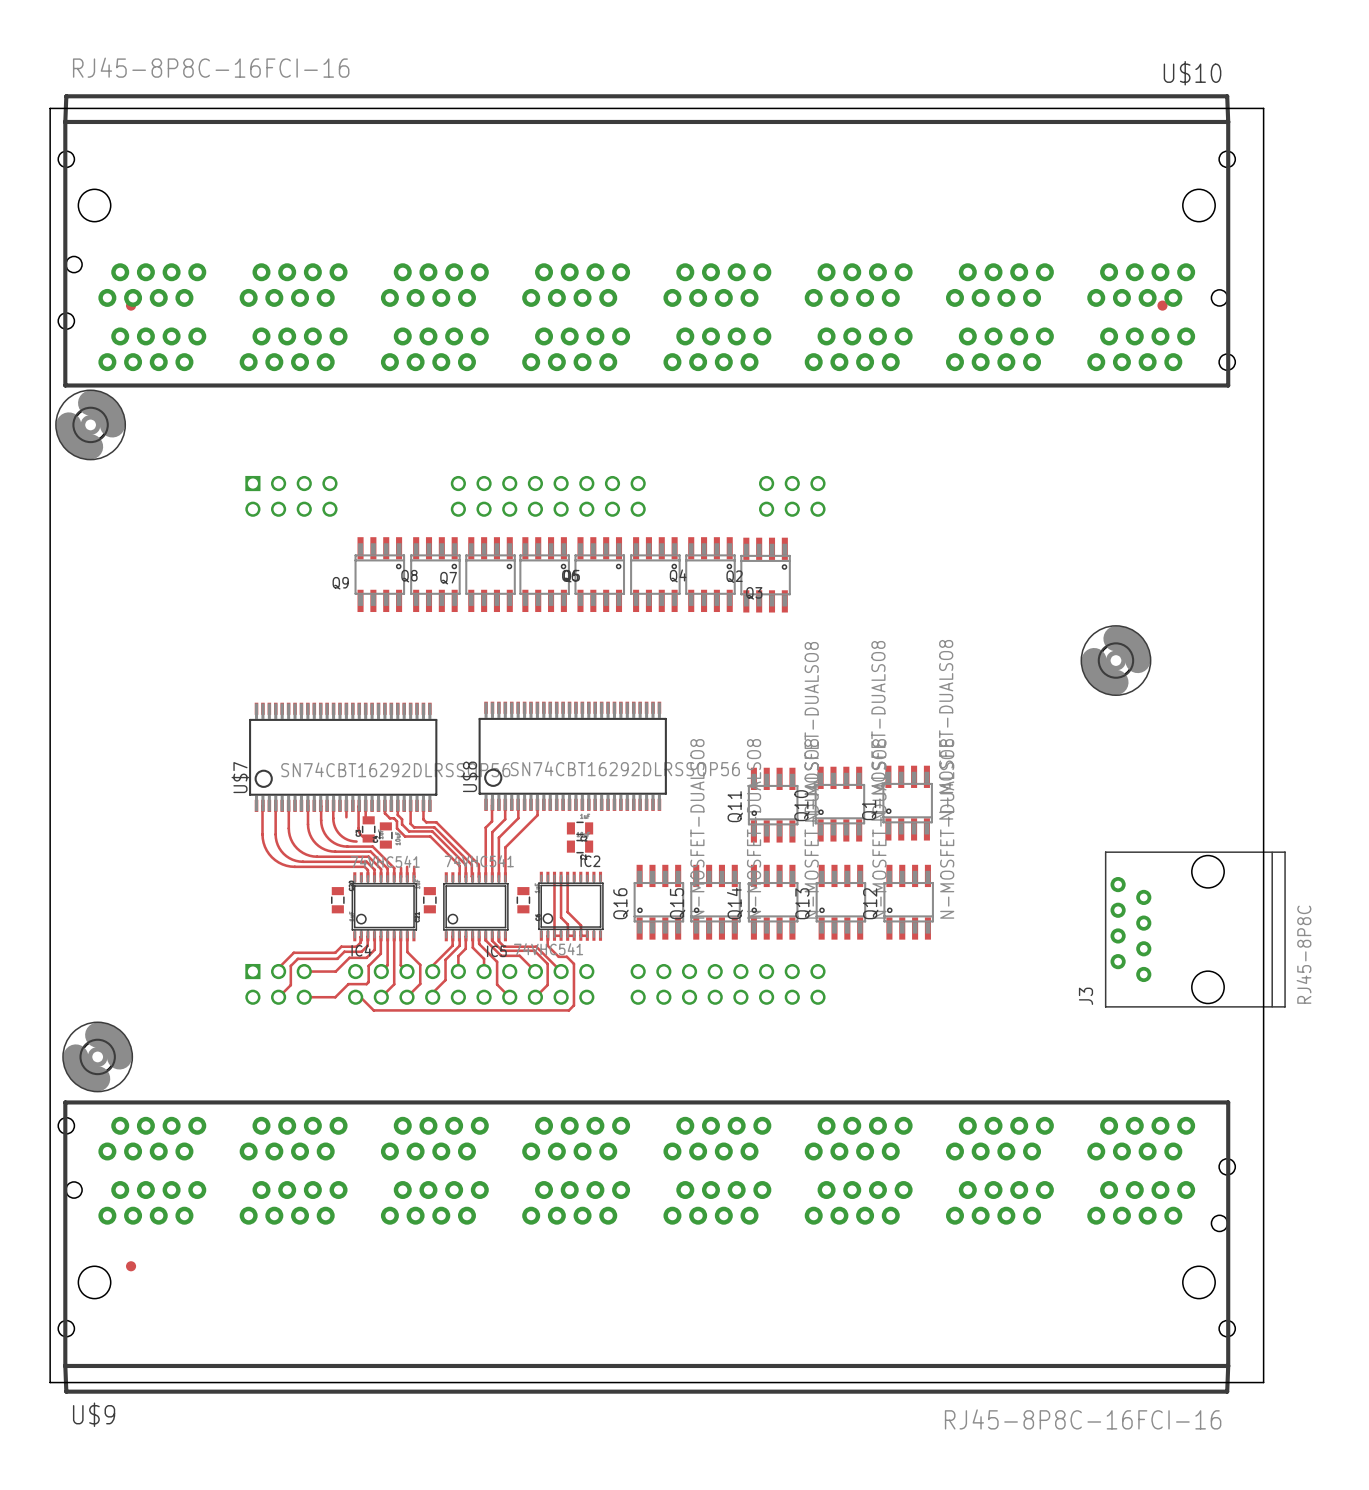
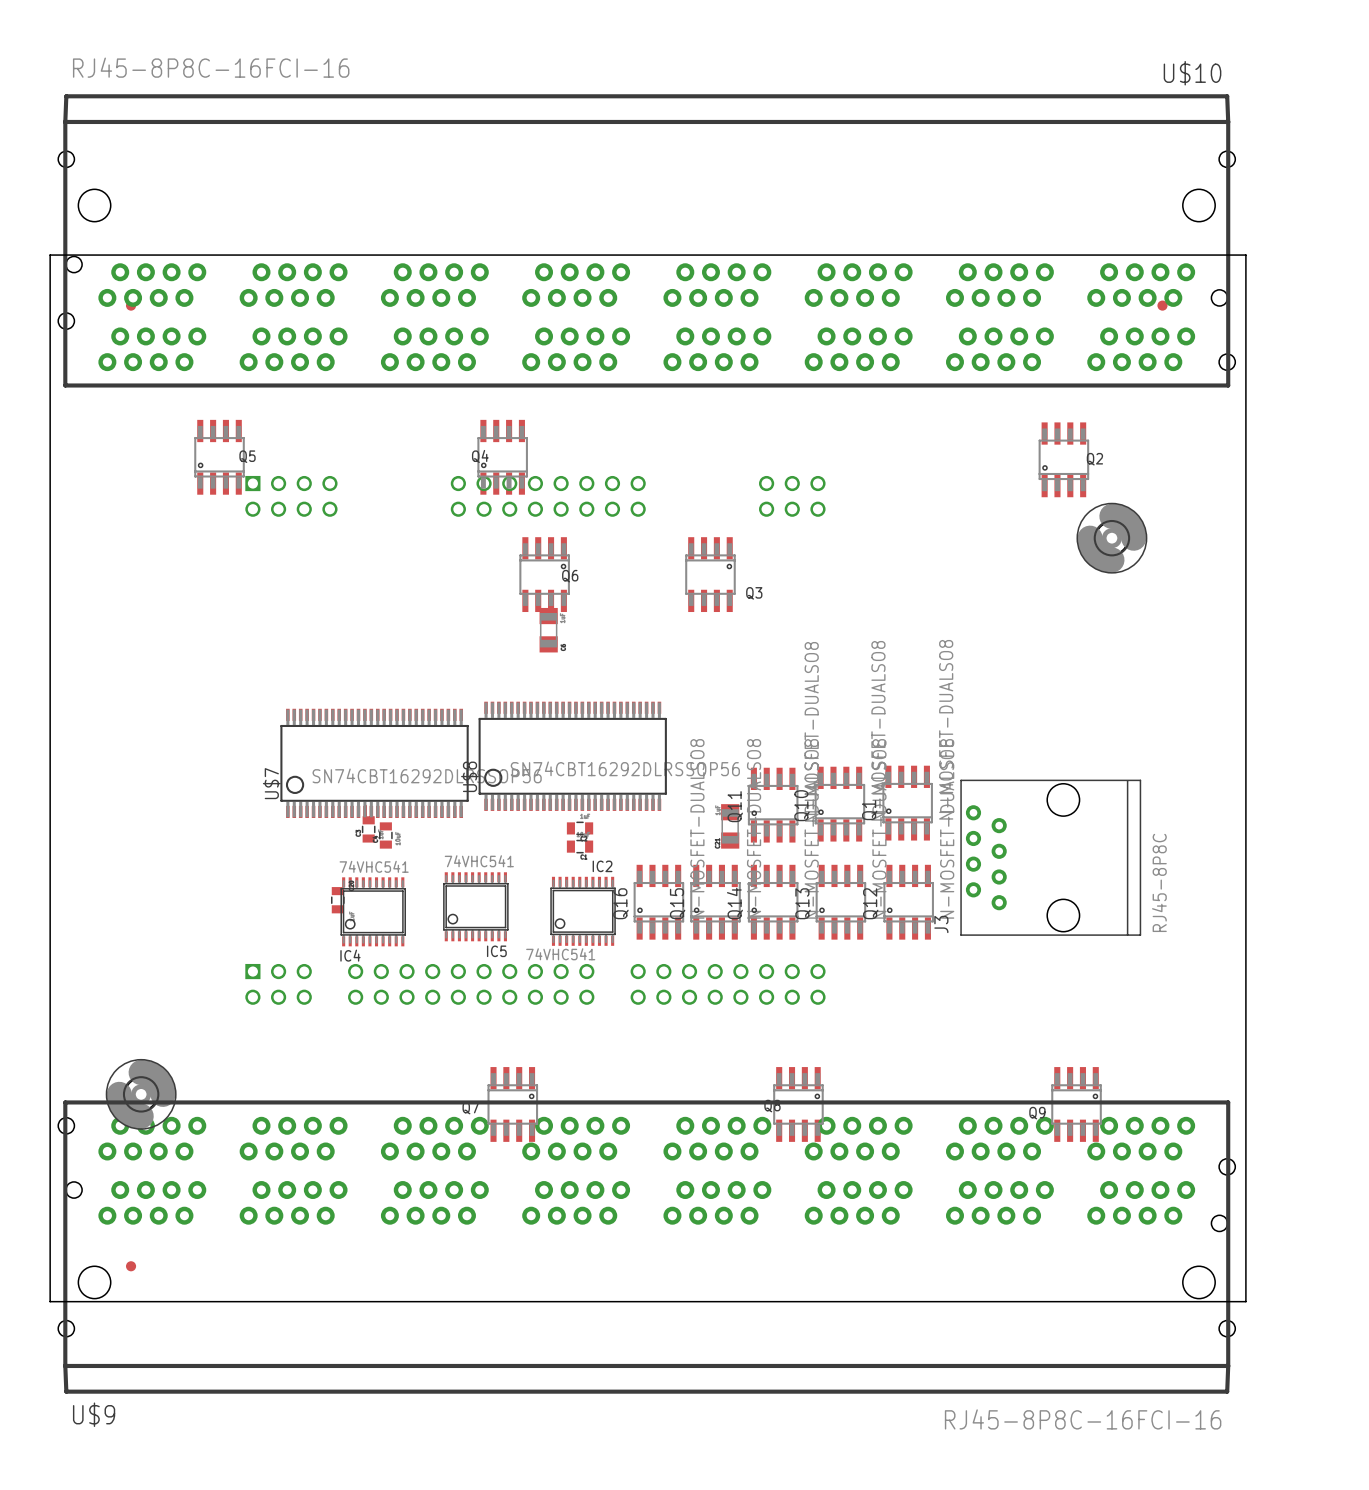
board edge: (50, 255) (50, 108) (1263, 108) (1263, 1382) (50, 1382) (50, 1301) -> (50, 255) (1245, 255) (1245, 1301) (50, 1301)
part: (90, 424) -> none
Q9 position: (379, 574) -> (1076, 1104)
Q8 position: (435, 574) -> (798, 1104)
Q7 position: (490, 574) -> (512, 1104)
Q5 rotation: 0° (599, 574) -> 180° (219, 457)
Q5 position: (599, 574) -> (219, 457)
Q4 rotation: 0° (655, 574) -> 180° (502, 457)
Q4 position: (655, 574) -> (502, 457)
Q2 rotation: 0° (765, 575) -> 180° (1063, 459)
Q2 position: (765, 575) -> (1063, 459)
part position: (1115, 660) -> (1111, 538)
U$7 position: (343, 757) -> (374, 763)
track: (492, 804) (492, 821) (485, 827) (485, 877) -> none
track: (505, 804) (505, 819) (492, 832) (492, 877) -> none
track: (518, 804) (518, 818) (498, 837) (498, 877) -> none
track: (537, 804) (537, 815) (505, 847) (505, 877) -> none
track: (275, 805) (276, 841) (286, 856) (299, 861) (366, 861) (374, 869) (374, 877) -> none
track: (288, 805) (289, 835) (299, 850) (313, 856) (368, 856) (381, 869) (381, 877) -> none
track: (307, 805) (308, 831) (316, 843) (331, 851) (370, 851) (387, 868) (387, 877) -> none
track: (320, 805) (322, 827) (328, 838) (344, 846) (372, 846) (394, 868) (394, 877) -> none
track: (333, 805) (333, 821) (336, 829) (344, 838) (356, 841) -> none
track: (346, 805) (346, 817) -> none
track: (359, 805) (358, 831) (362, 836) (368, 838) -> none
track: (384, 805) (384, 813) (396, 821) (396, 828) (405, 836) (430, 836) (459, 865) (459, 877) -> none
track: (397, 805) (397, 815) (402, 819) (402, 824) (409, 831) (432, 831) (465, 864) (466, 877) -> none
track: (410, 805) (410, 823) (414, 827) (434, 827) (471, 864) (472, 877) -> none
track: (423, 805) (423, 819) (426, 822) (436, 822) (478, 864) (479, 877) -> none
track: (262, 806) (263, 842) (266, 850) (275, 860) (290, 866) (364, 866) (367, 870) (367, 877) -> none
track: (407, 866) (407, 877) -> none
track: (414, 866) (413, 877) -> none
track: (401, 867) (400, 877) -> none
track: (554, 876) (554, 935) (561, 935) -> none
track: (561, 876) (561, 917) (567, 924) (567, 935) (574, 935) -> none
track: (567, 876) (567, 912) (581, 925) (580, 935) (587, 935) -> none
part footprint: [423, 887, 437, 914] -> [721, 804, 740, 849]
part footprint: [516, 887, 531, 914] -> [539, 607, 558, 653]
IC4 position: (384, 906) -> (373, 911)
IC2 position: (570, 906) -> (583, 911)
J3 position: (1195, 929) -> (1050, 857)
track: (547, 935) (547, 945) (558, 956) (566, 956) (573, 963) (573, 1005) (568, 1010) (373, 1010) (360, 997) (355, 997) -> none
track: (361, 936) (360, 942) (356, 946) (341, 946) (335, 952) (293, 952) (278, 968) (278, 971) -> none
track: (367, 936) (367, 945) (361, 951) (344, 951) (337, 958) (297, 958) (290, 965) (290, 985) (278, 997) -> none
track: (374, 936) (374, 949) (366, 957) (349, 957) (335, 971) (304, 971) -> none
track: (381, 936) (380, 953) (368, 965) (368, 982) (366, 984) (348, 984) (335, 997) (304, 997) -> none
track: (387, 936) (387, 965) (381, 971) -> none
track: (394, 936) (394, 984) (381, 997) -> none
track: (400, 936) (400, 965) (407, 971) -> none
track: (407, 936) (407, 952) (420, 964) (420, 983) (407, 997) -> none
track: (452, 936) (452, 945) (432, 965) (432, 971) -> none
track: (459, 936) (459, 945) (445, 959) (445, 980) (432, 992) (432, 997) -> none
track: (466, 936) (465, 948) (458, 956) (458, 971) -> none
track: (472, 936) (472, 947) (484, 958) (484, 971) -> none
track: (479, 936) (479, 943) (497, 961) (497, 984) (509, 997) -> none
track: (485, 936) (485, 940) (501, 955) (519, 955) (535, 971) -> none
track: (492, 936) (492, 940) (502, 950) (534, 950) (547, 963) (547, 984) (535, 997) -> none
track: (498, 936) (498, 941) (504, 946) (536, 946) (561, 971) -> none
part position: (97, 1056) -> (141, 1094)

